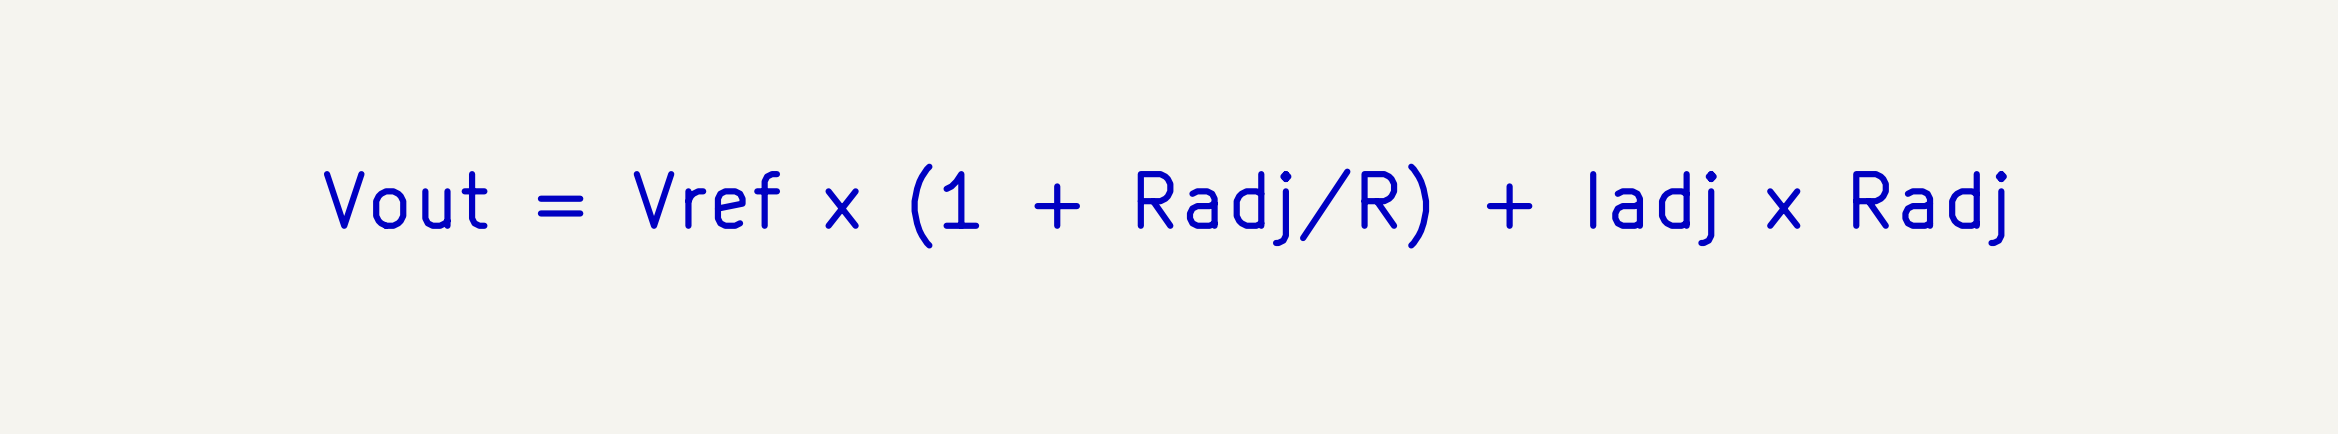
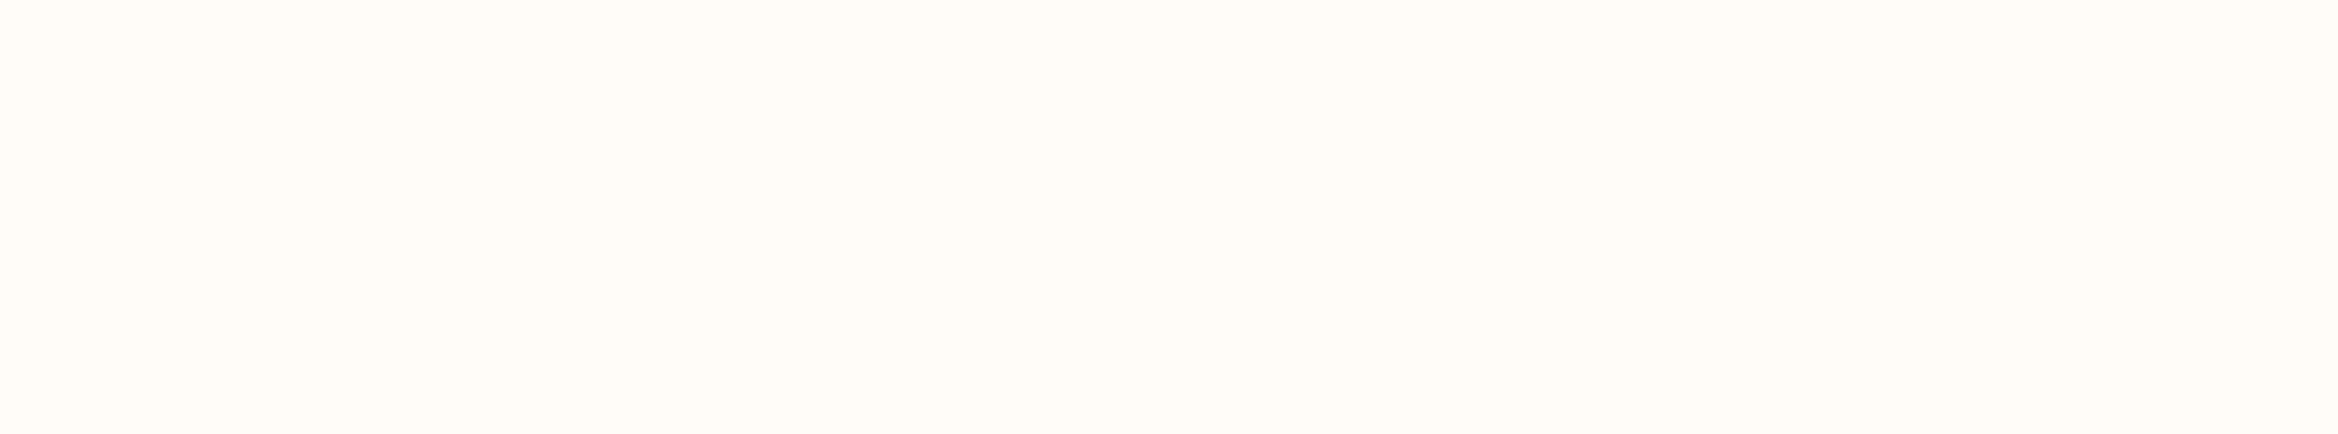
text: Vout = Vref x (1 + Radj/R) + Iadj x Radj (1165, 206) -> none

